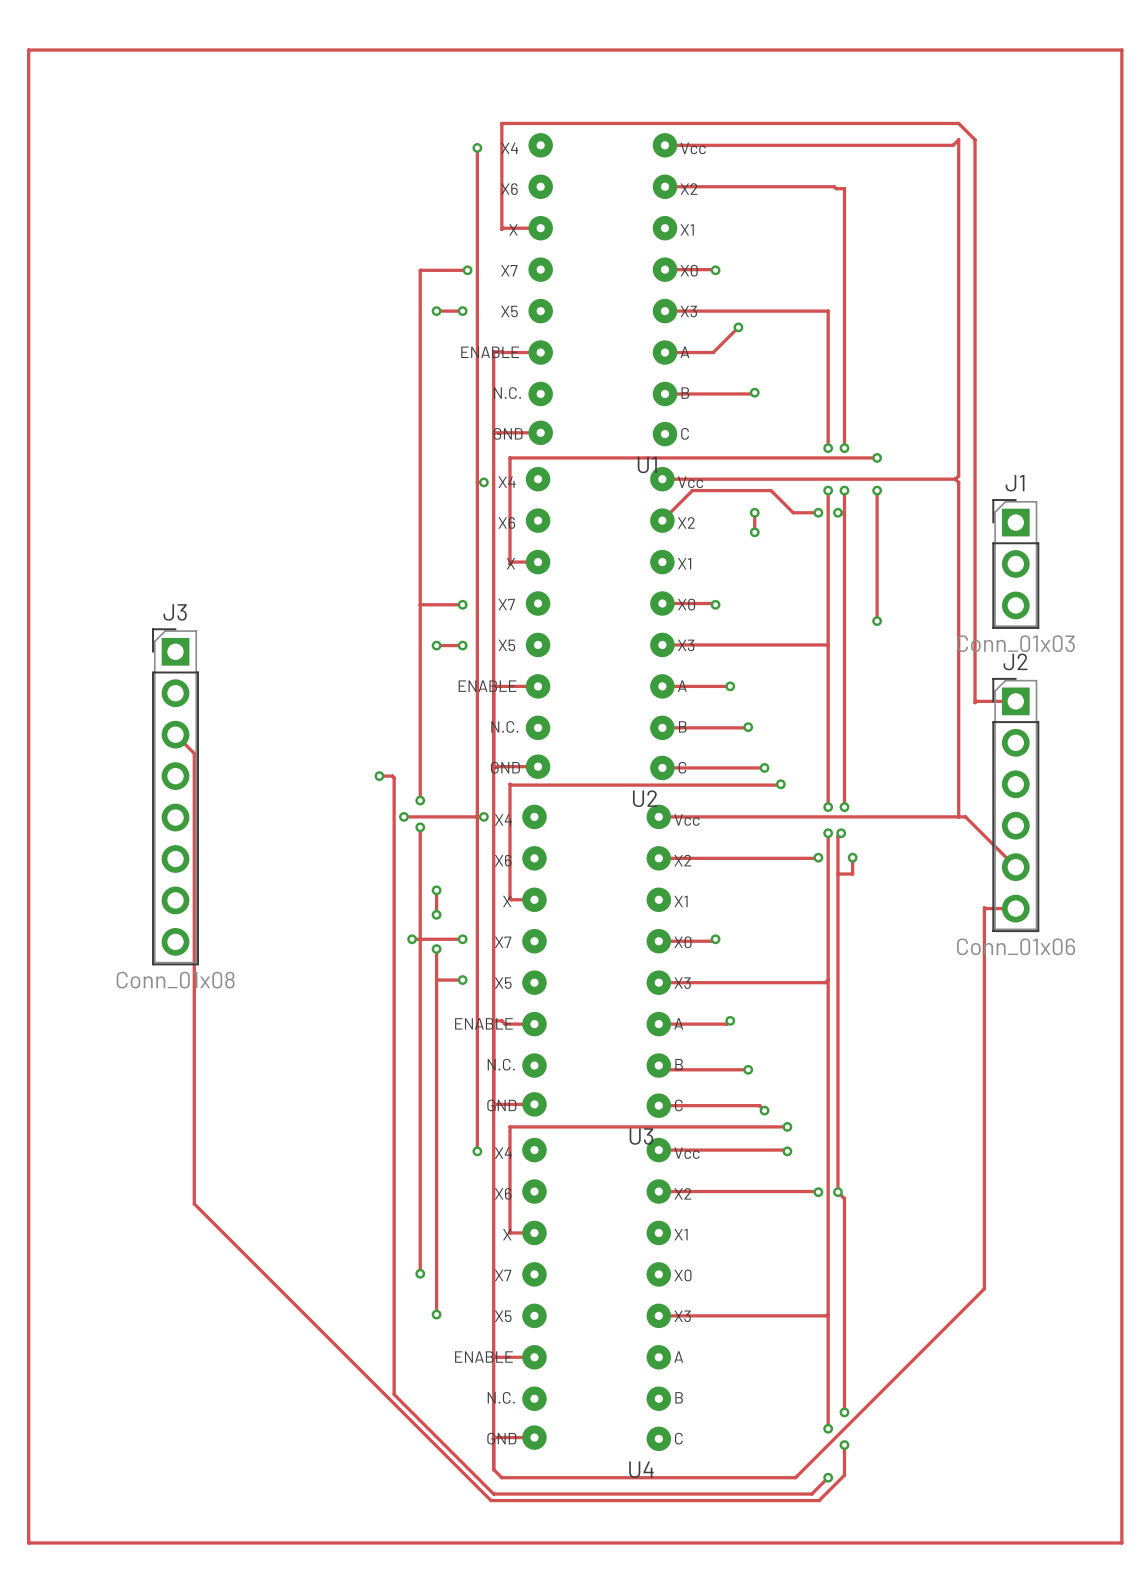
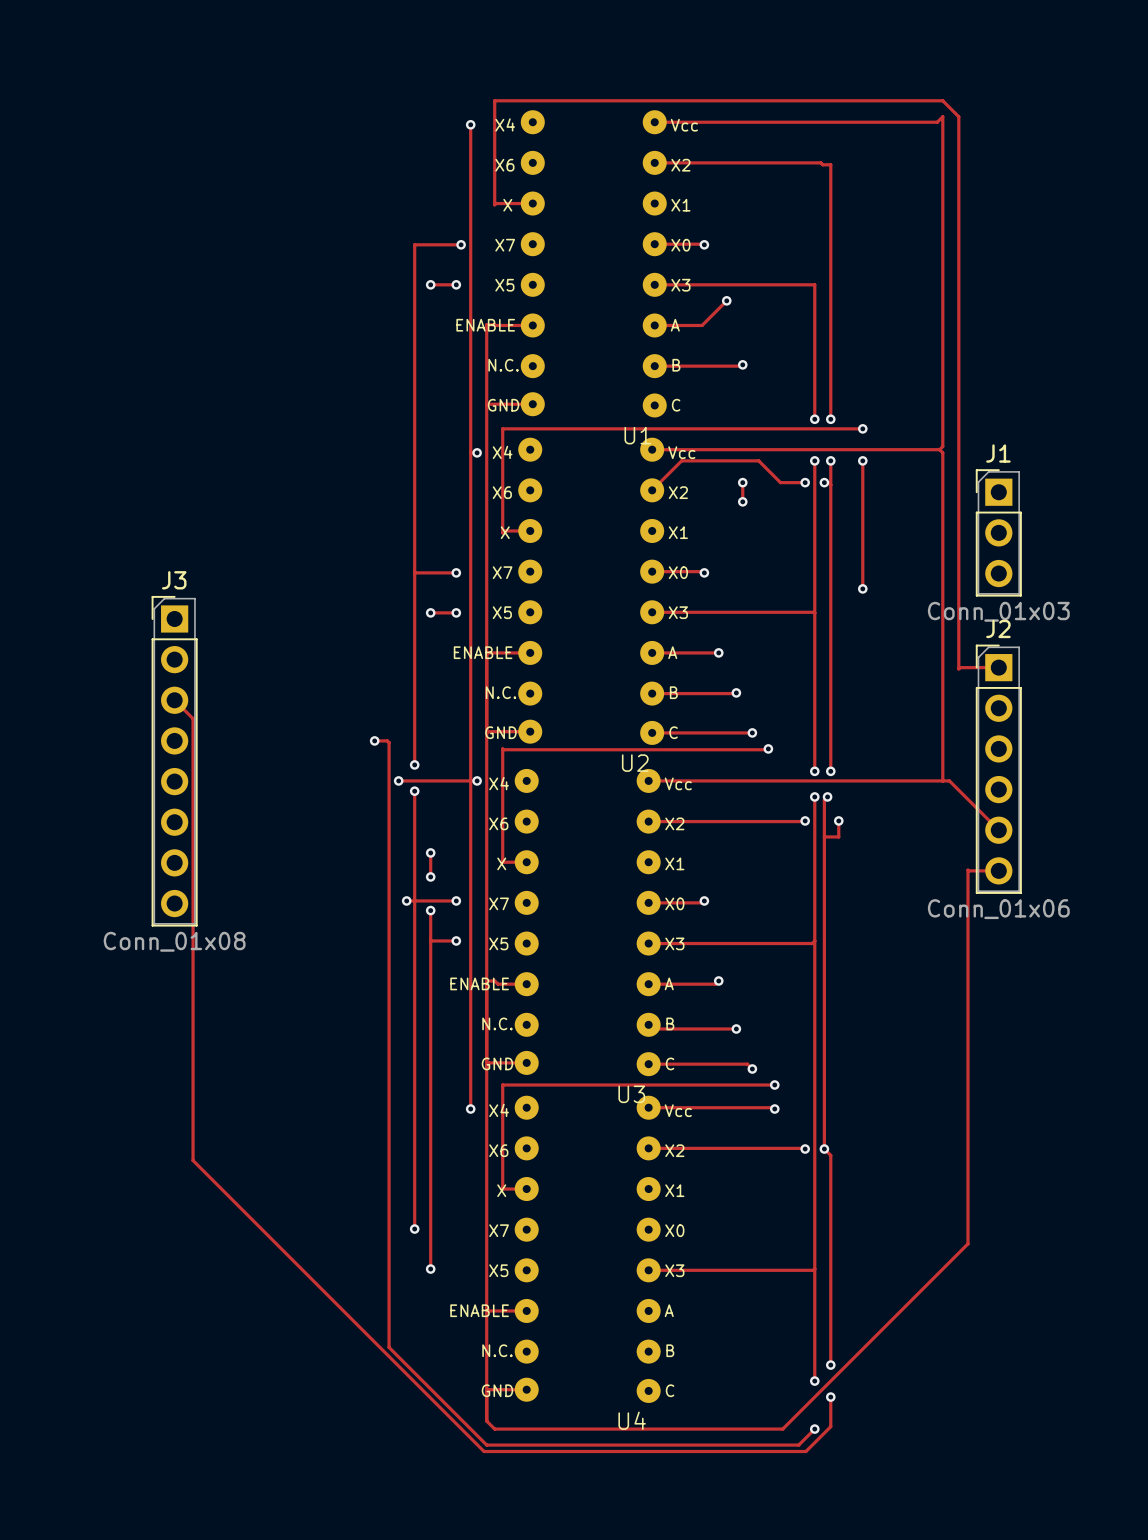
track: (28, 50) (1121, 50) (1121, 1542) (28, 1542) (28, 50) -> none

